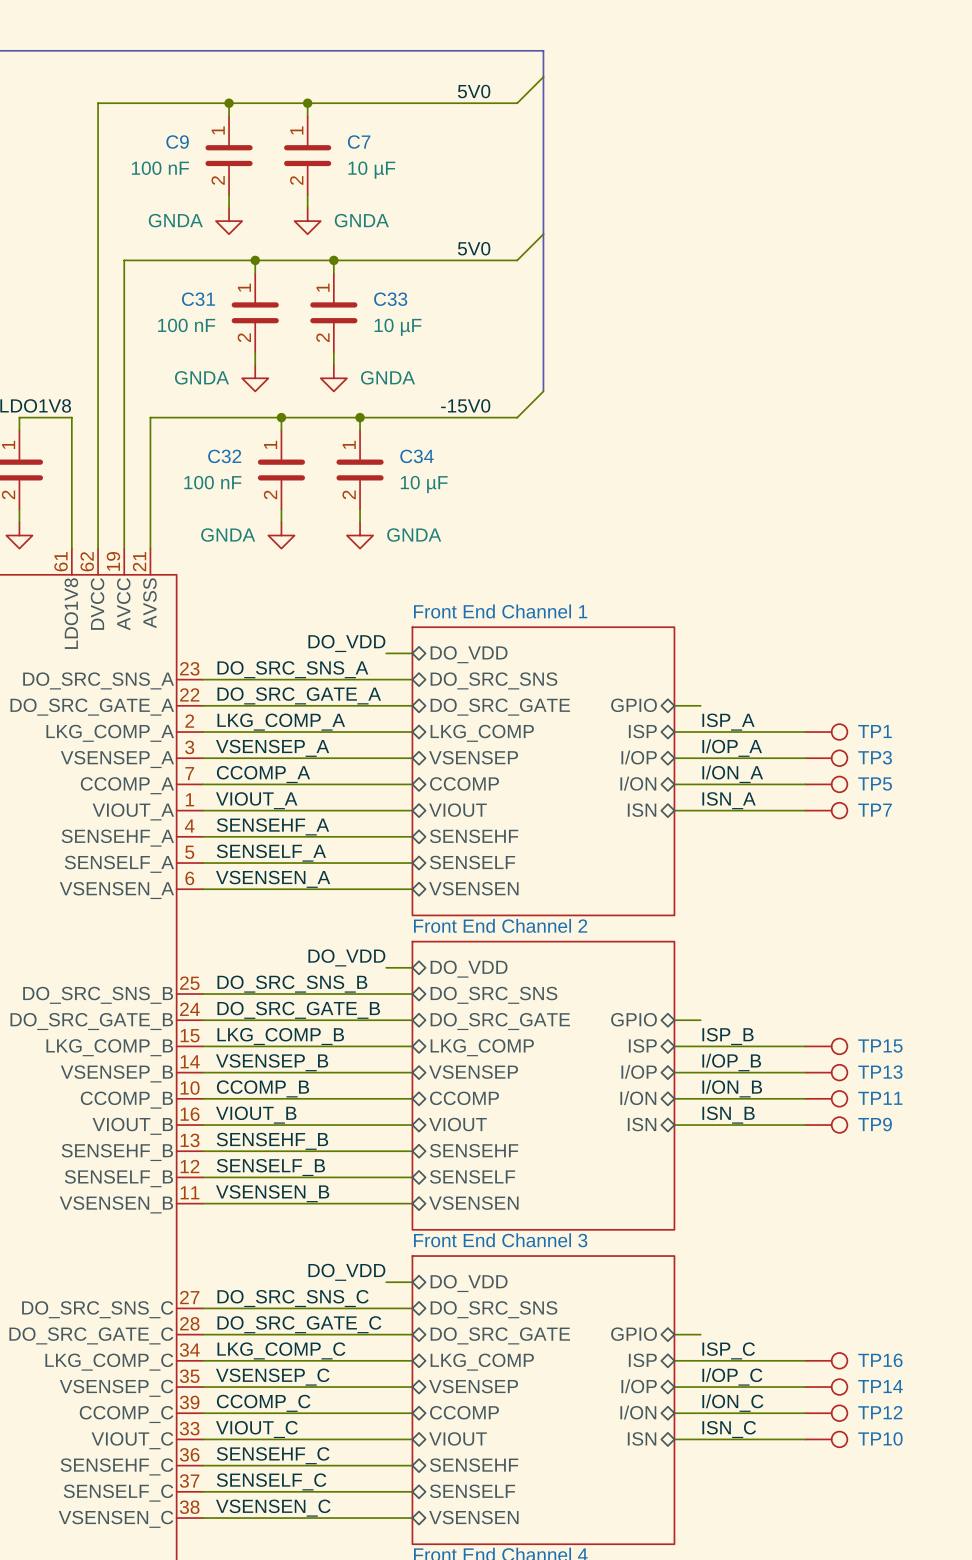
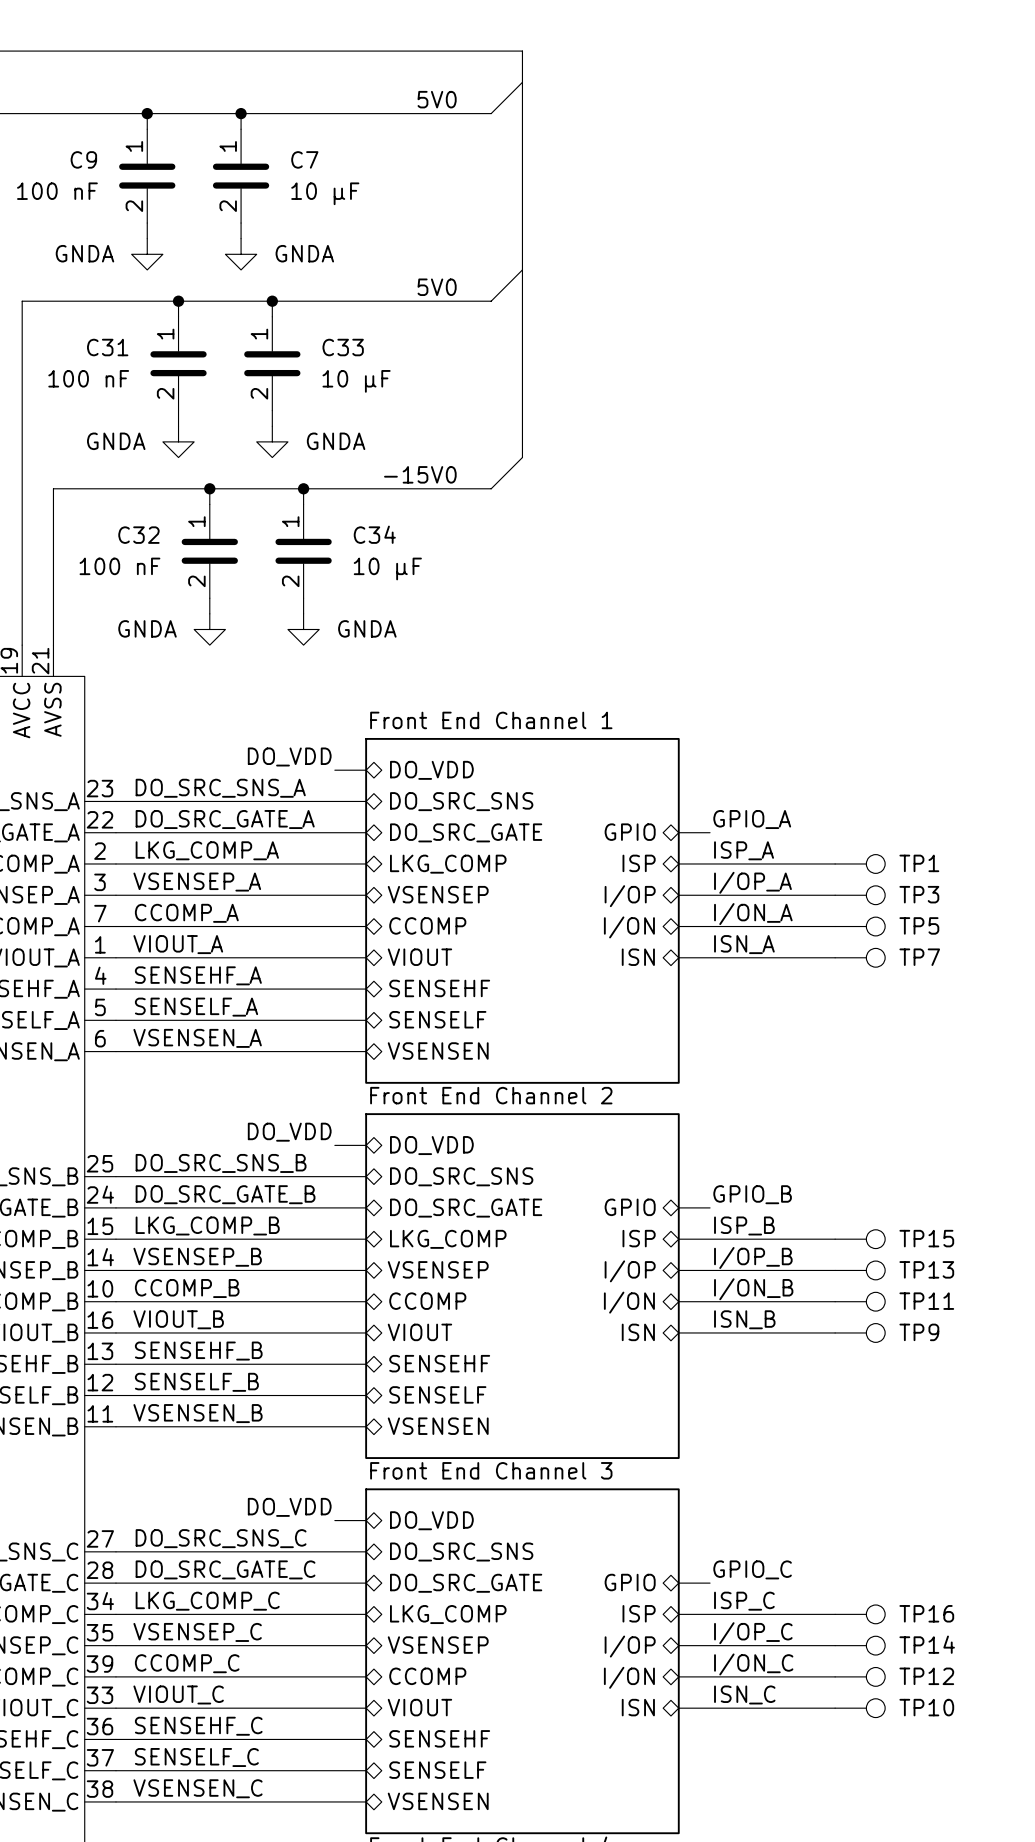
label: none -> GPIO_A (752, 819)
label: none -> GPIO_B (752, 1194)
label: none -> GPIO_C (752, 1569)

